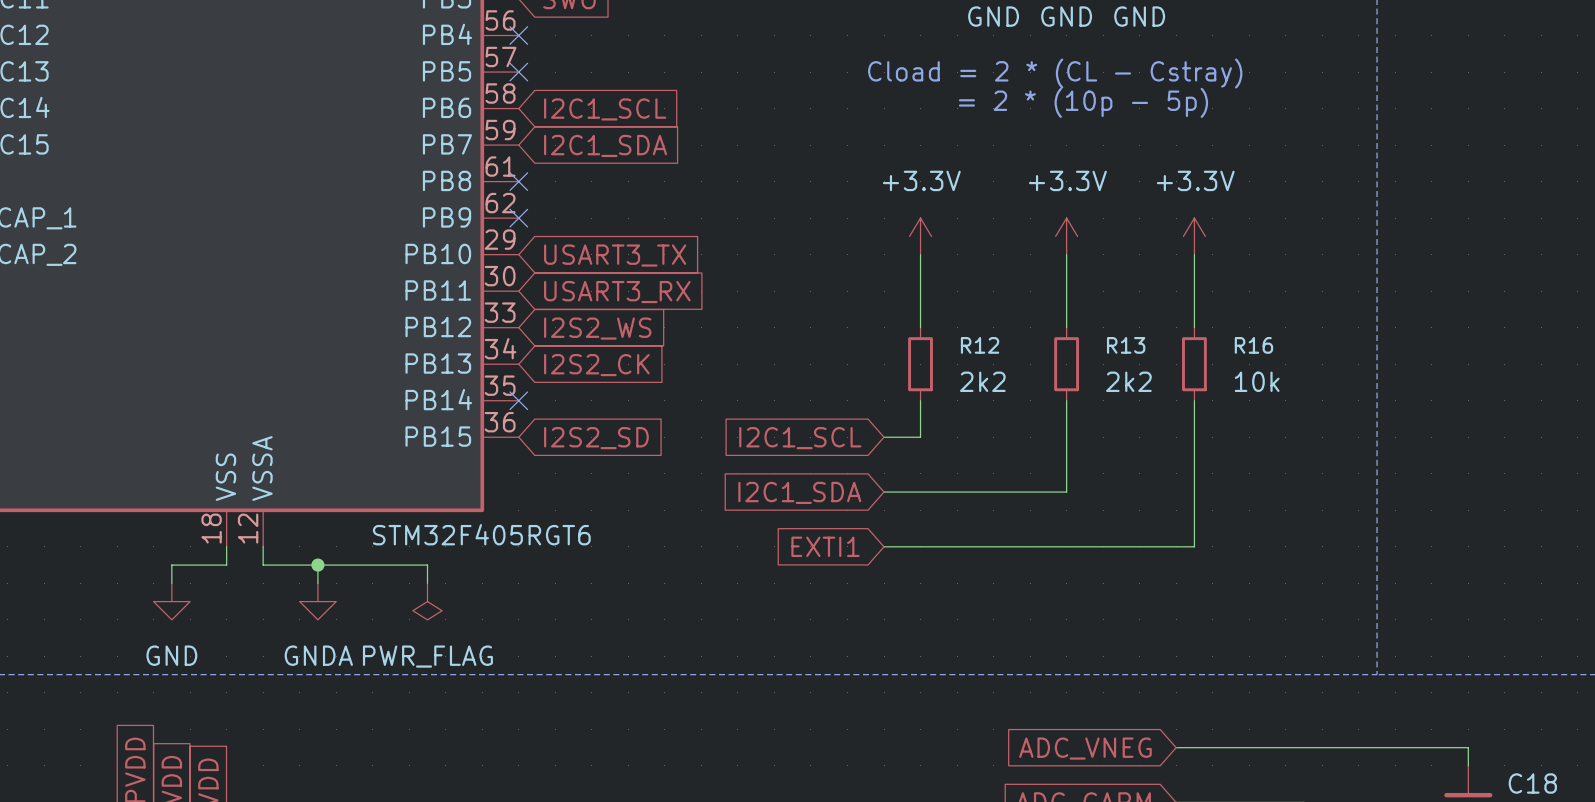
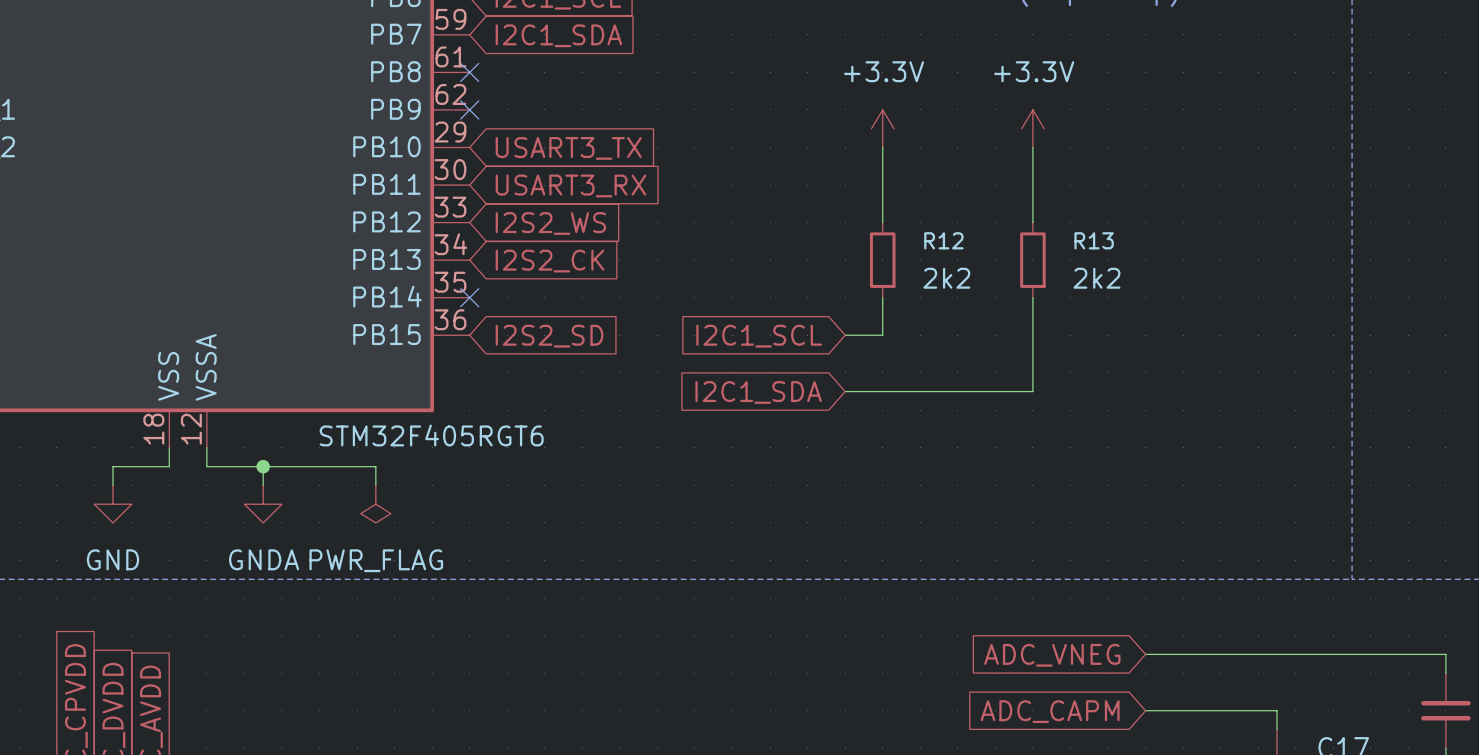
power symbol: +3.3V (1194, 236) -> none
wire: (1194, 254) (1194, 327) -> none
R16: 10k (1194, 364) -> none
wire: (1194, 400) (1194, 546) (884, 546) -> none
global label: EXTI1 (825, 546) -> none

